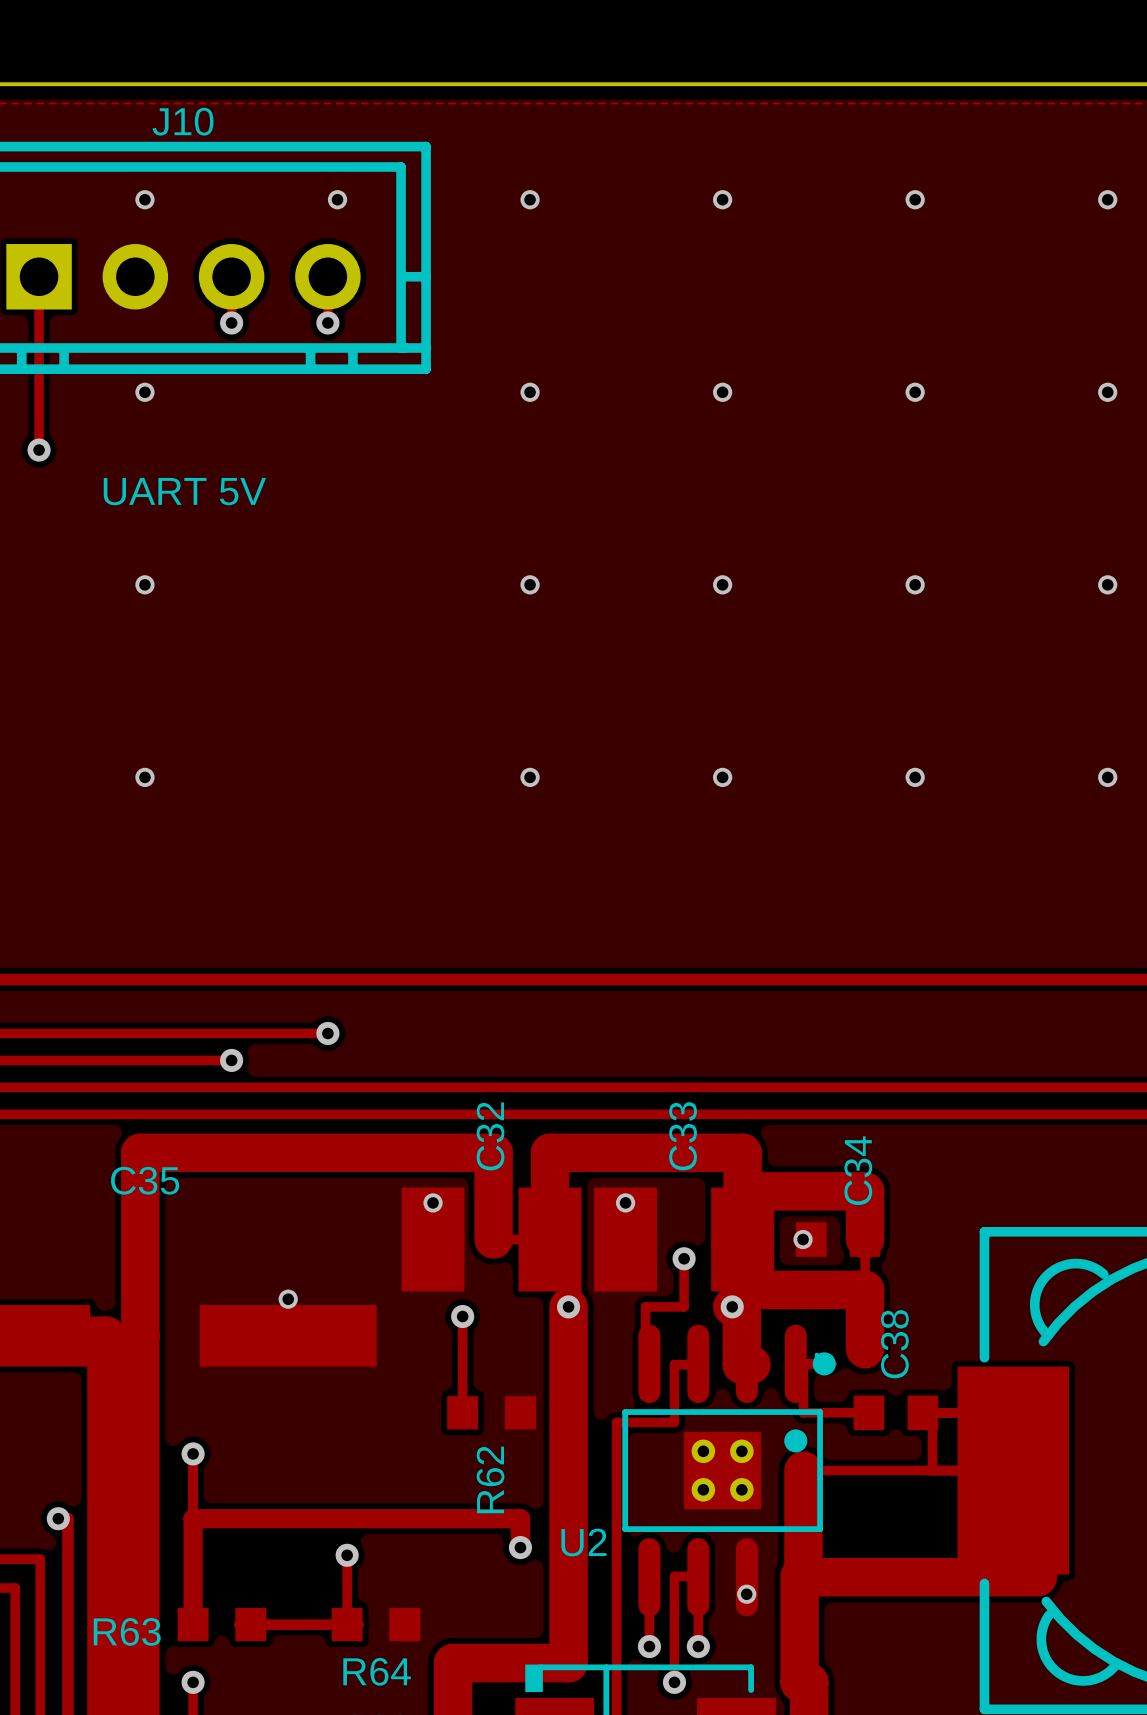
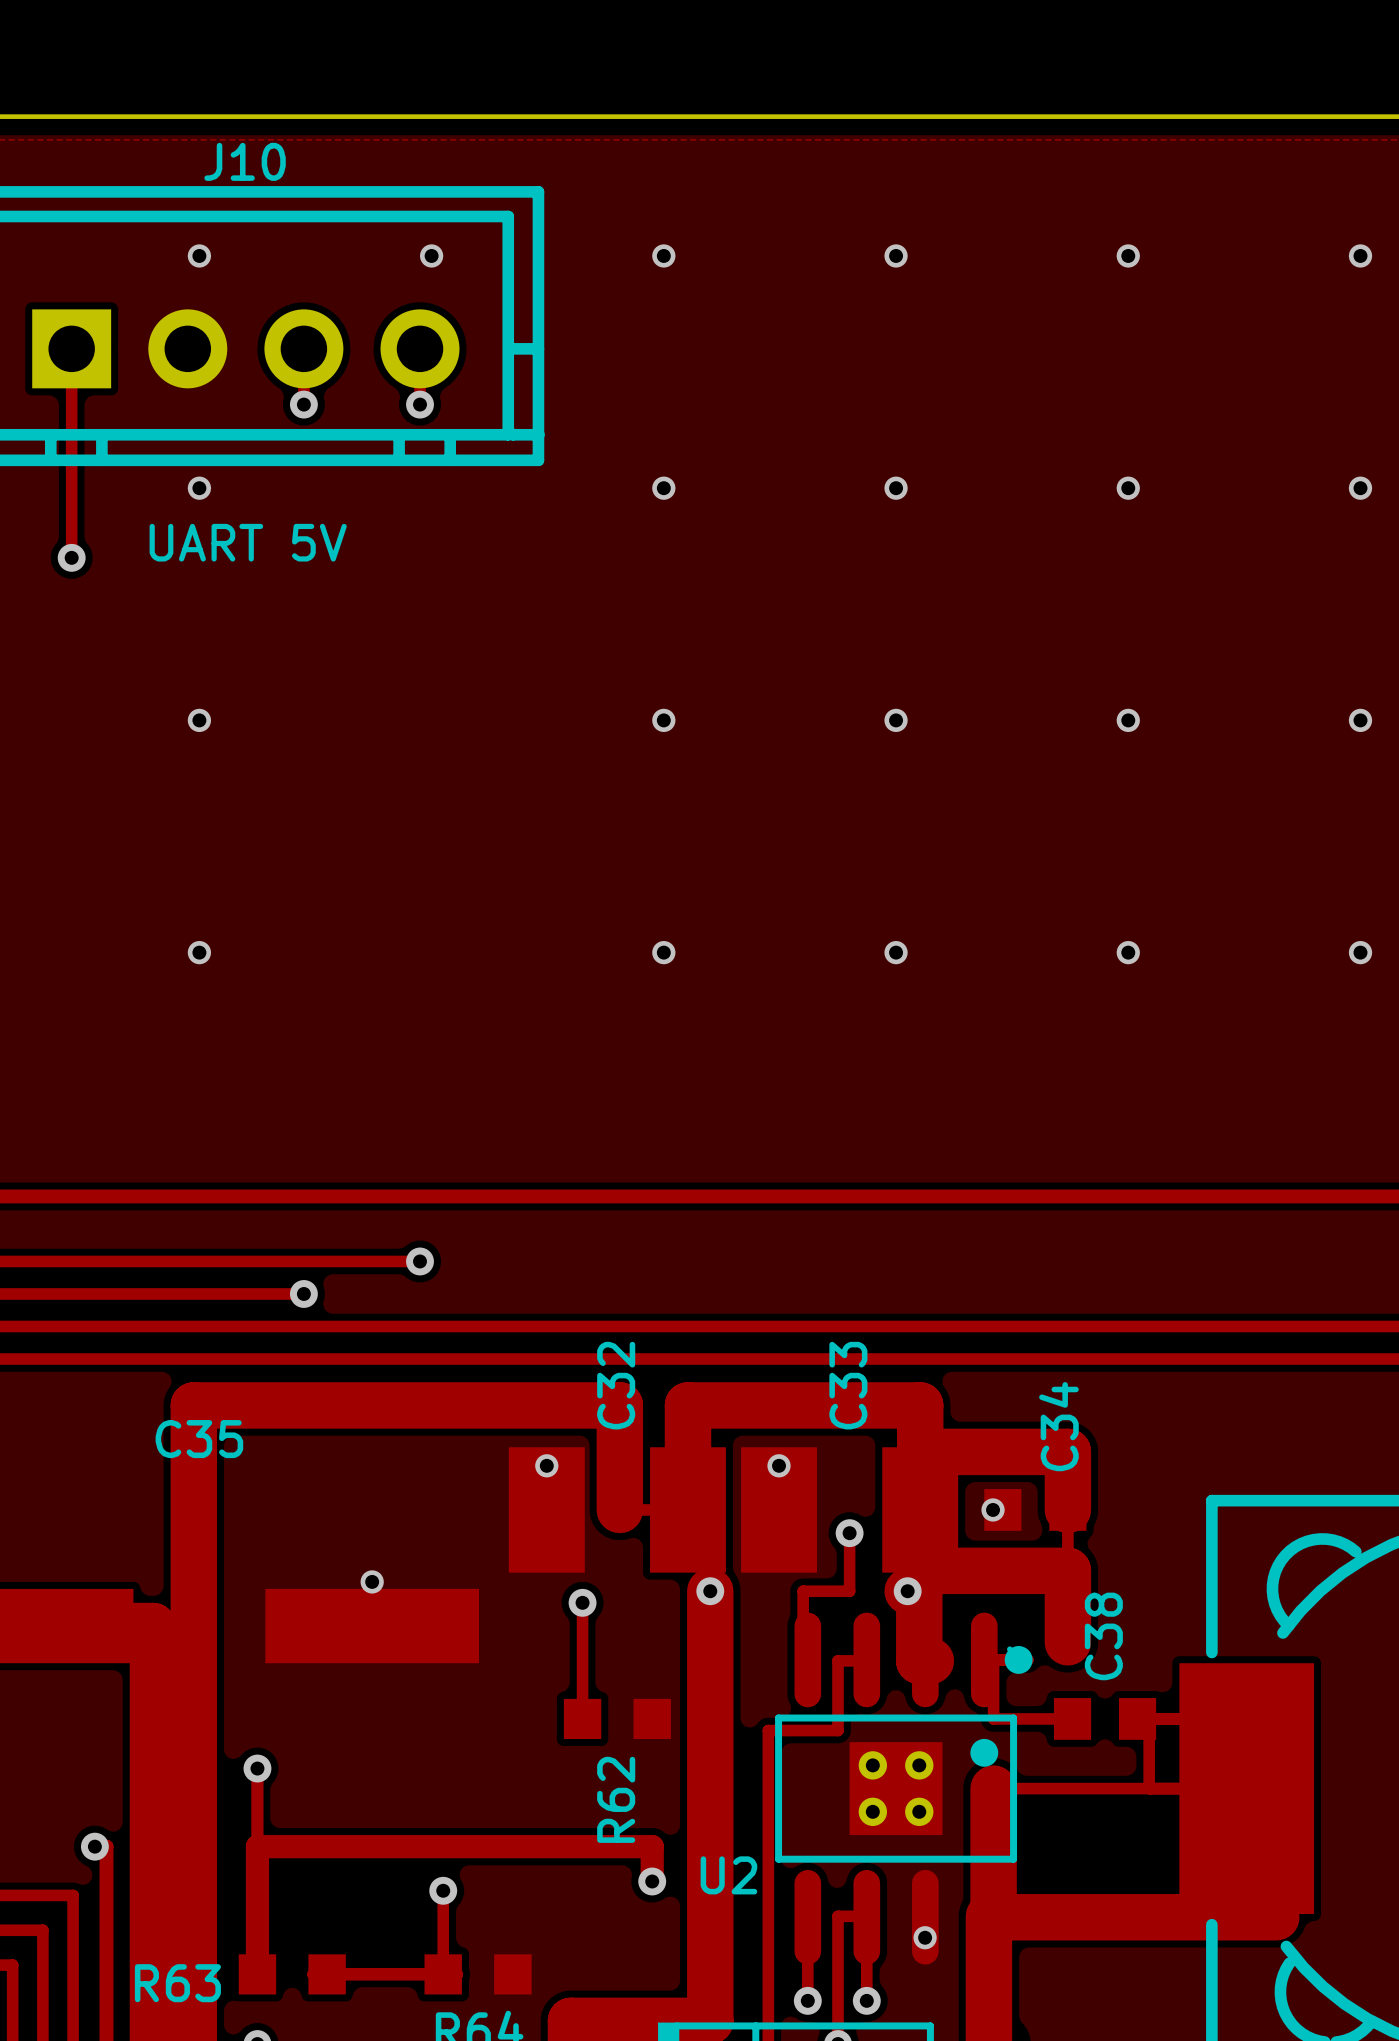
text position: UART 5V (184, 491) -> UART 5V (248, 542)

